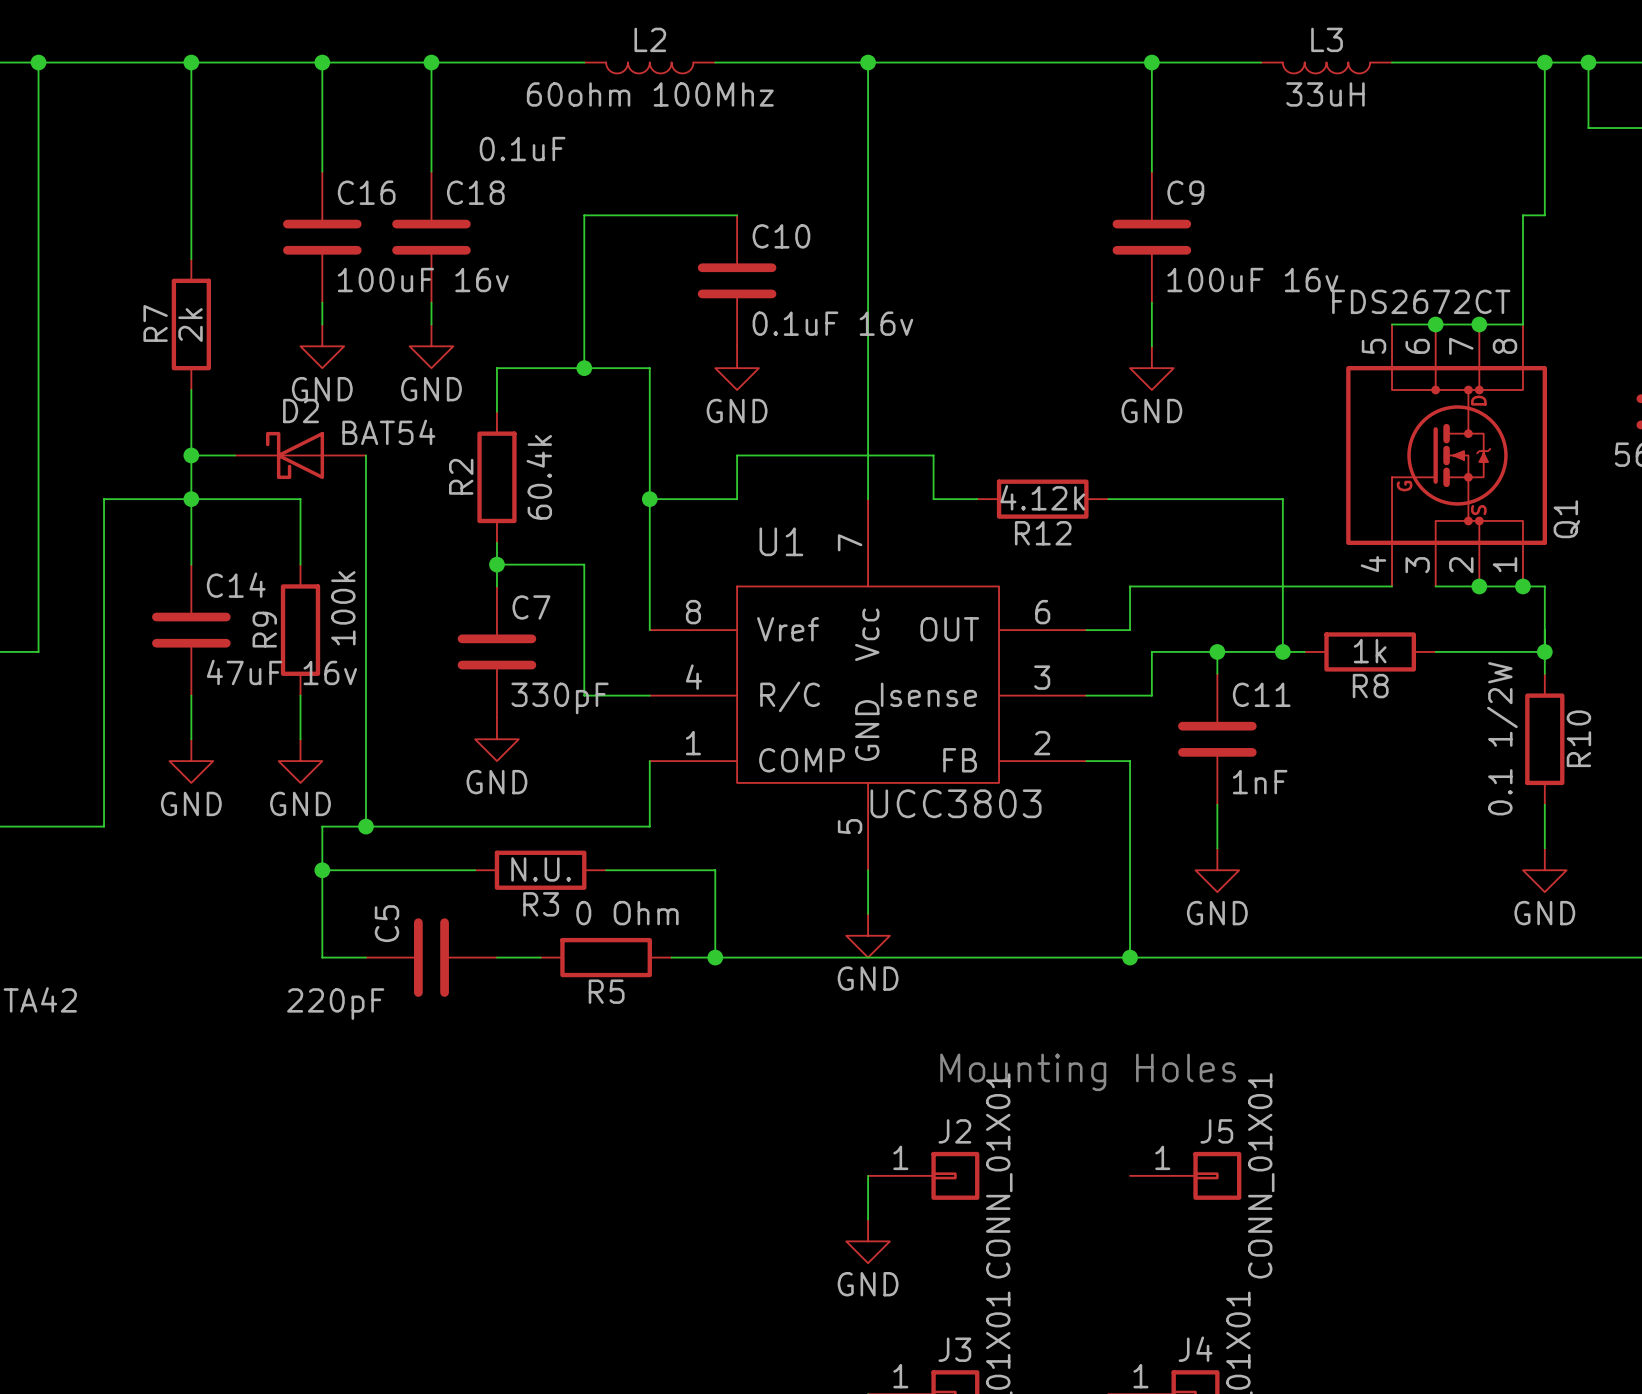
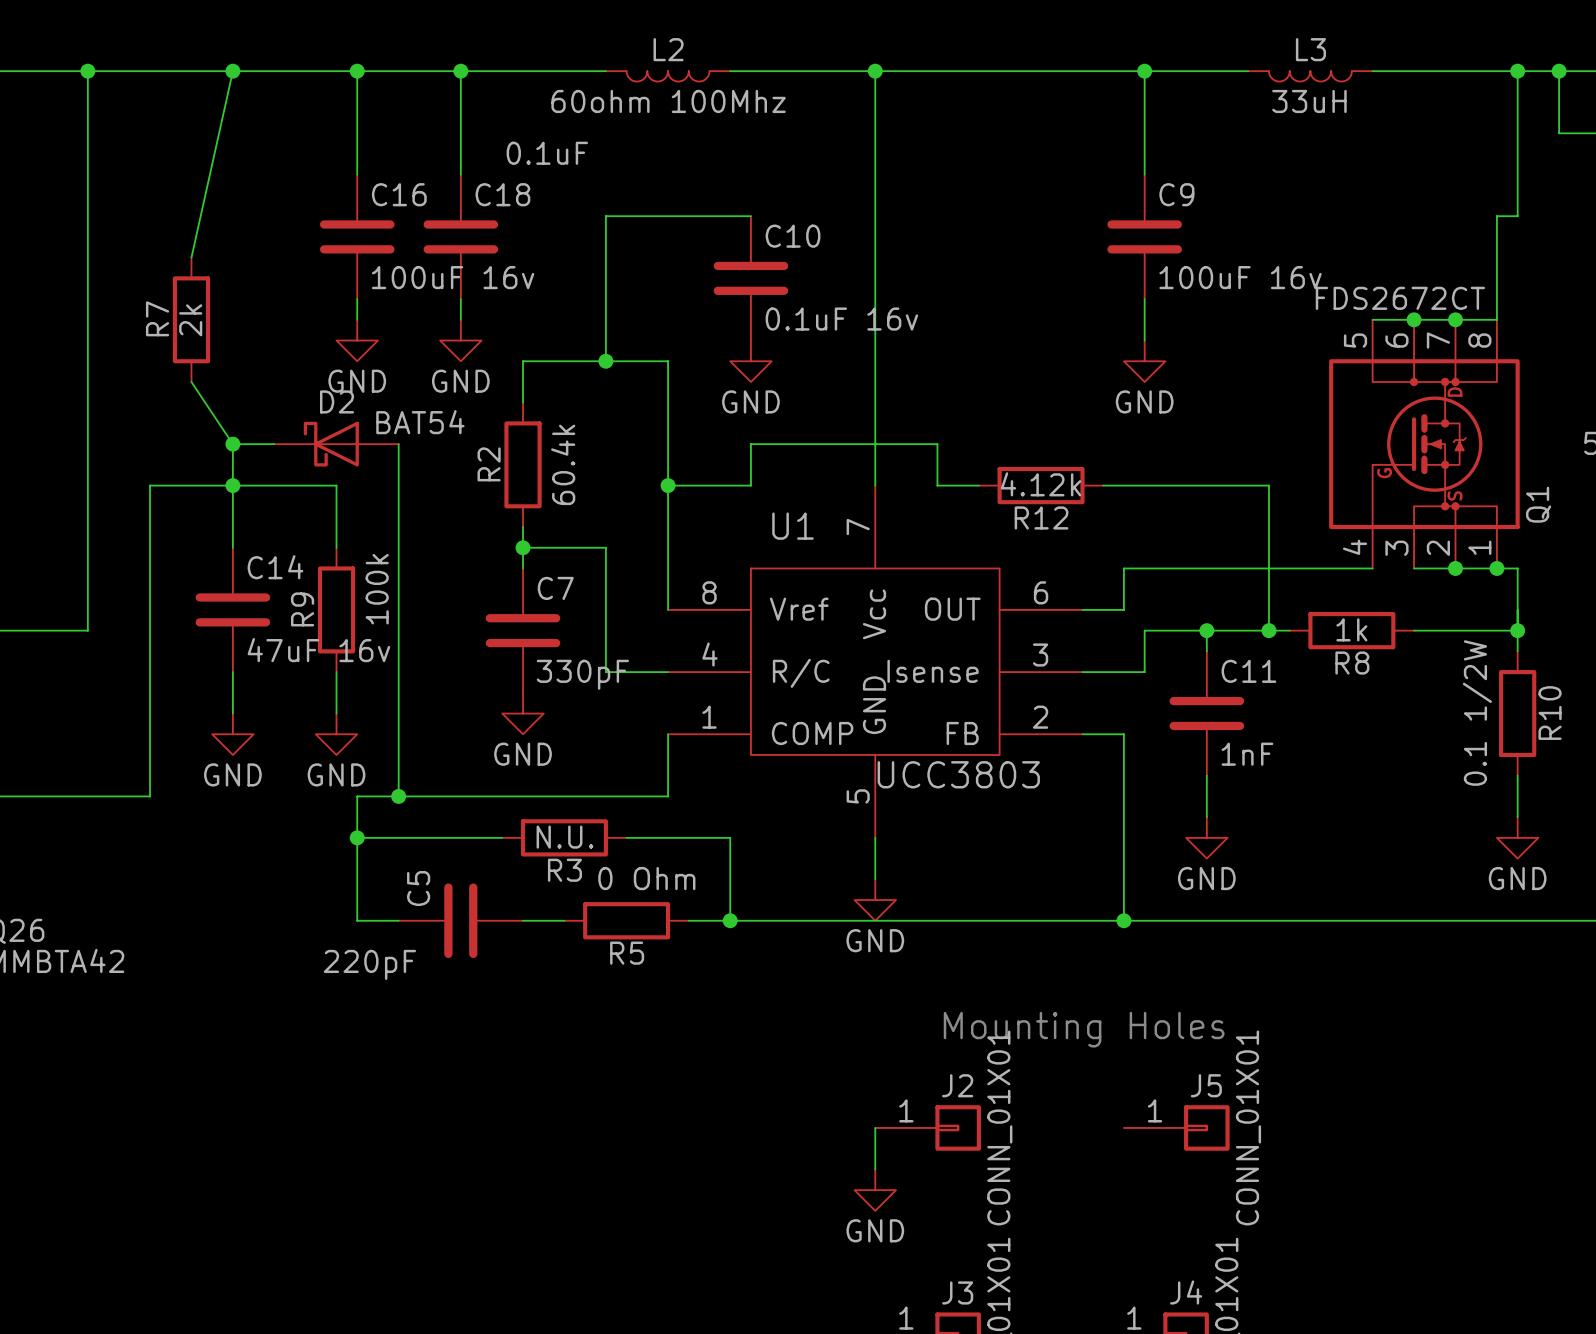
wire: (191, 62) (191, 259) -> (232, 71) (191, 257)
R7 position: (191, 324) -> (191, 319)
wire: (191, 389) (191, 455) -> (191, 381) (232, 444)

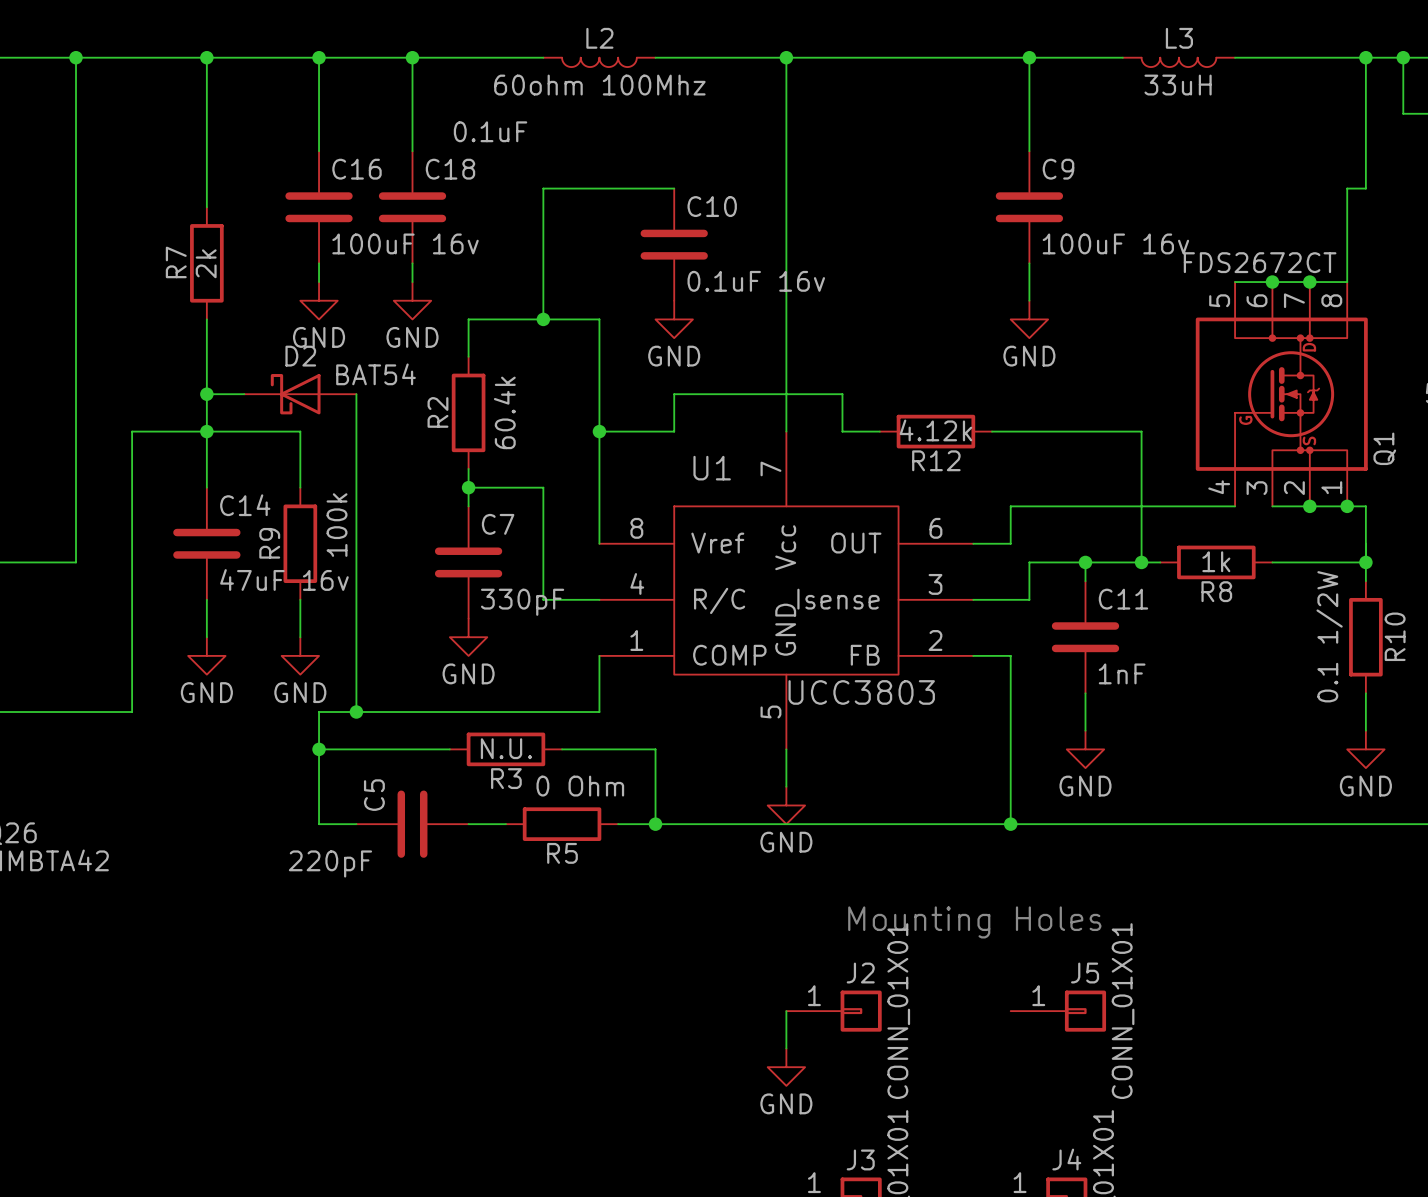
wire: (232, 71) (191, 257) -> (206, 57) (206, 207)
R7 position: (191, 319) -> (206, 263)
wire: (191, 381) (232, 444) -> (206, 319) (206, 394)

